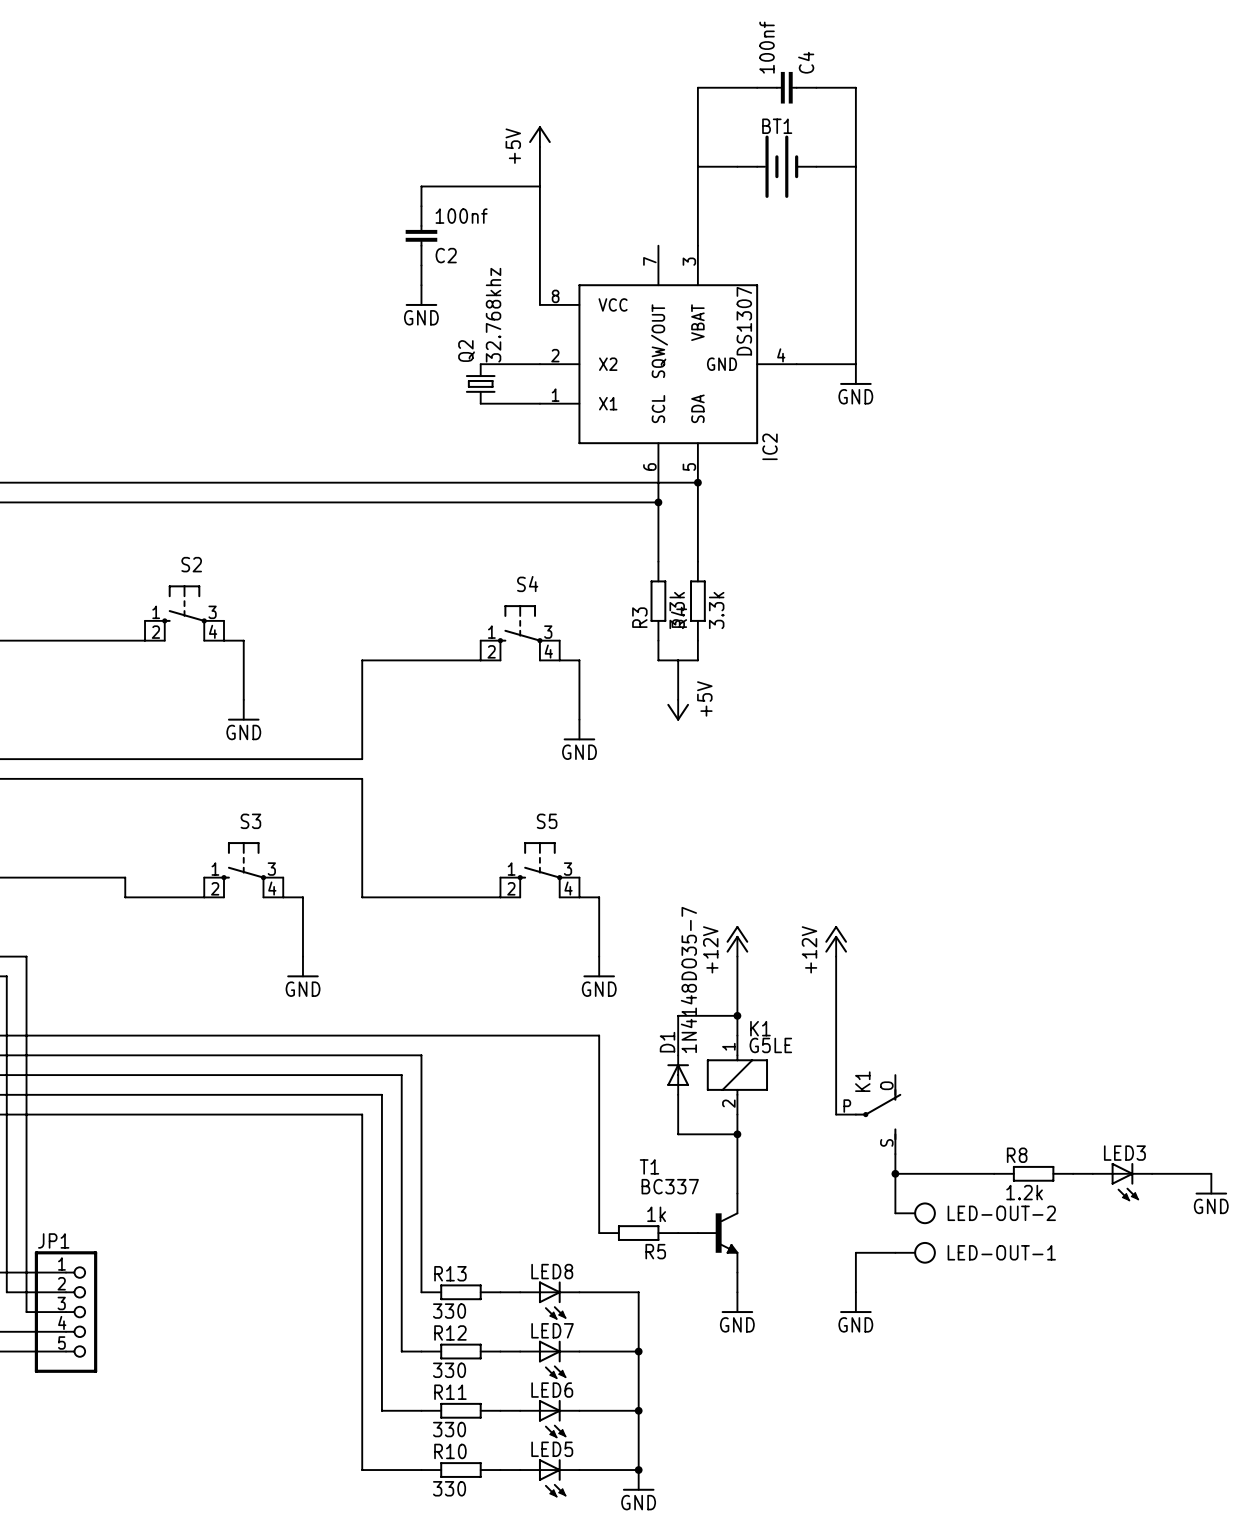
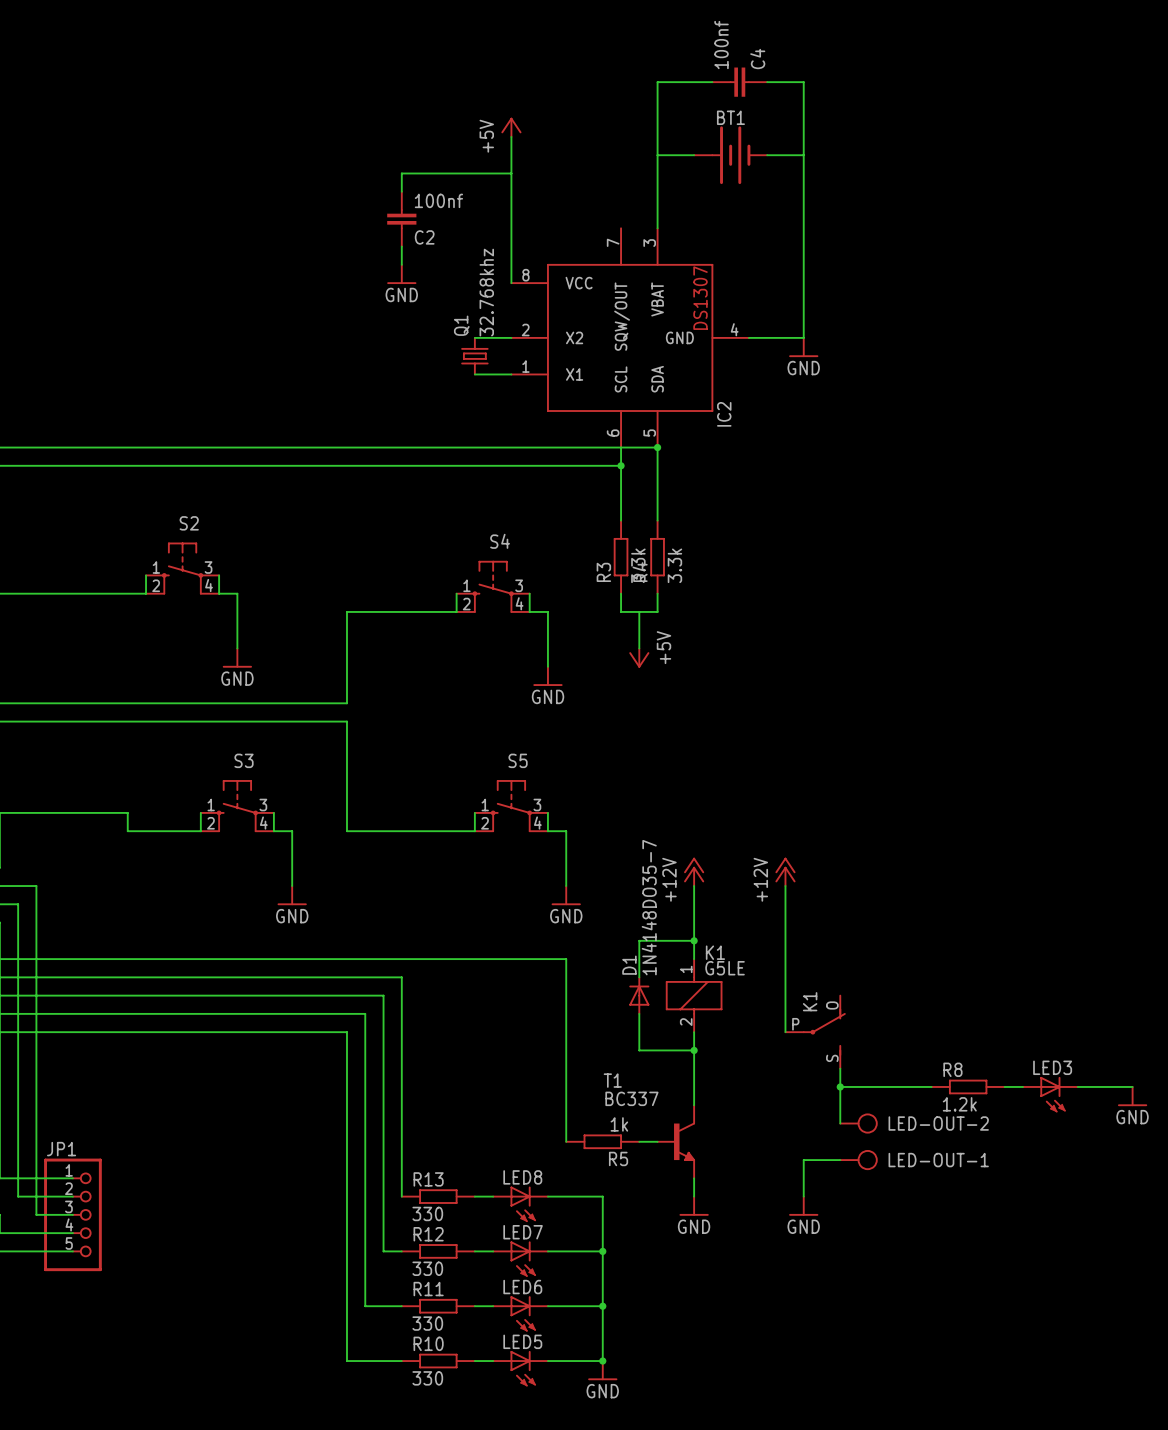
wire: (480, 364) (500, 364) -> none
Q2: 32.768khz (480, 383) -> none
Q1: none -> 32.768khz (474, 356)
wire: (480, 403) (500, 403) -> none

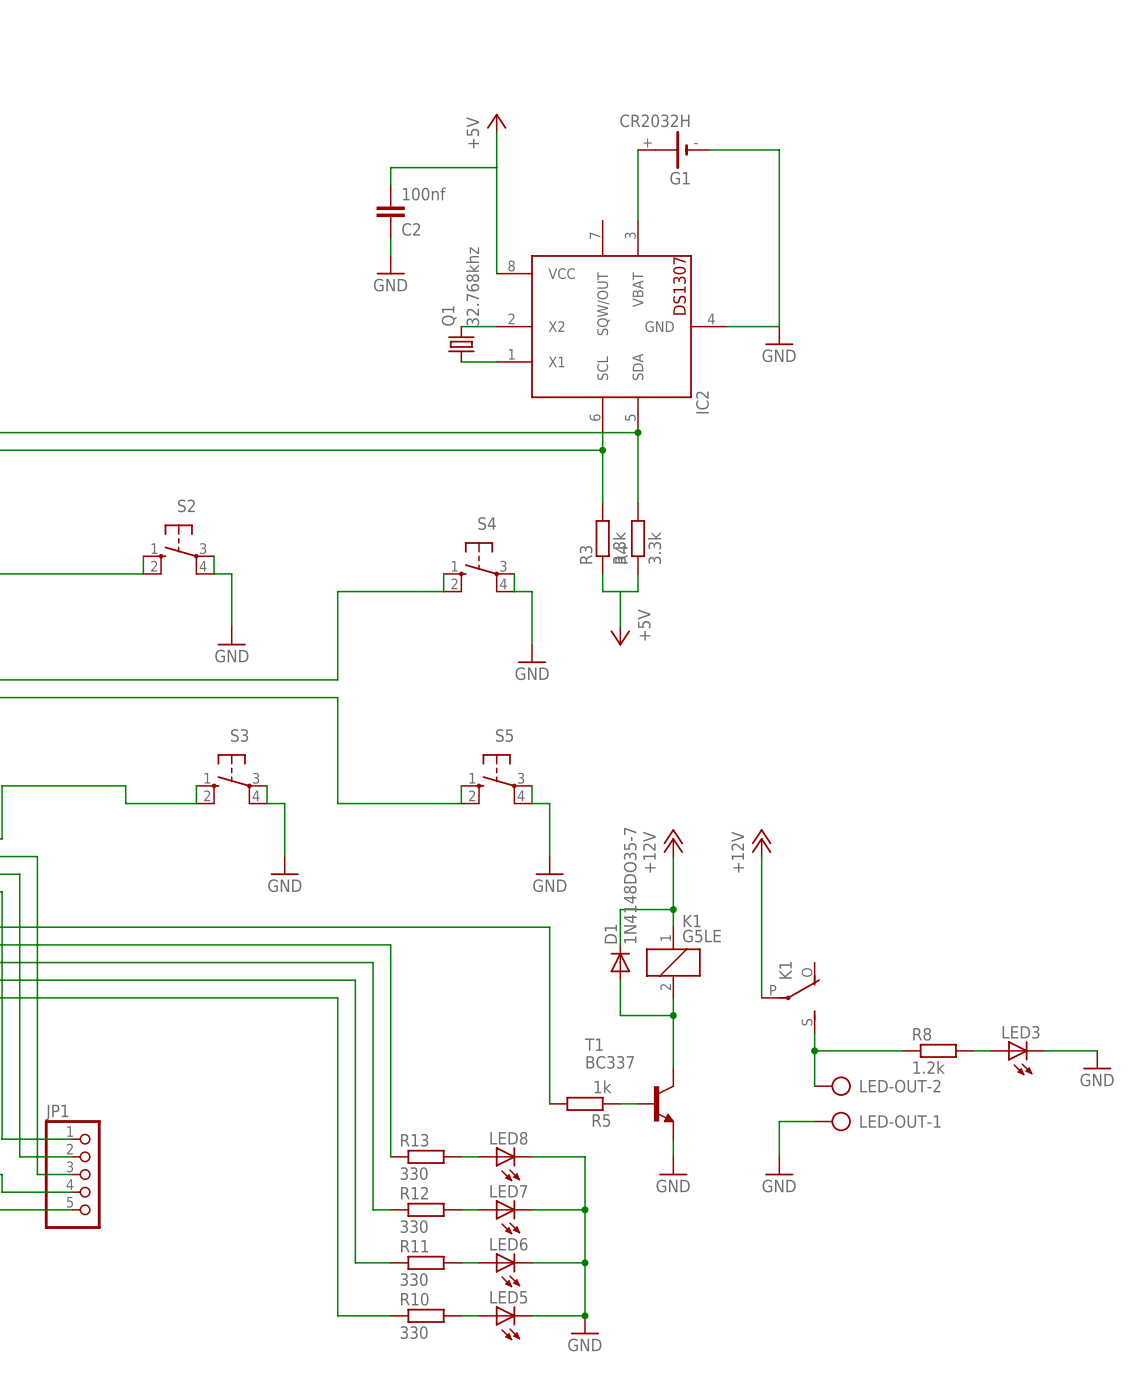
wire: (712, 82) (657, 82) (657, 155) (694, 155) -> none
C4: 100nf (739, 82) -> none
wire: (767, 82) (803, 82) (803, 155) -> none
G1: none -> CR2032H (673, 149)
BT1: (730, 155) -> none

